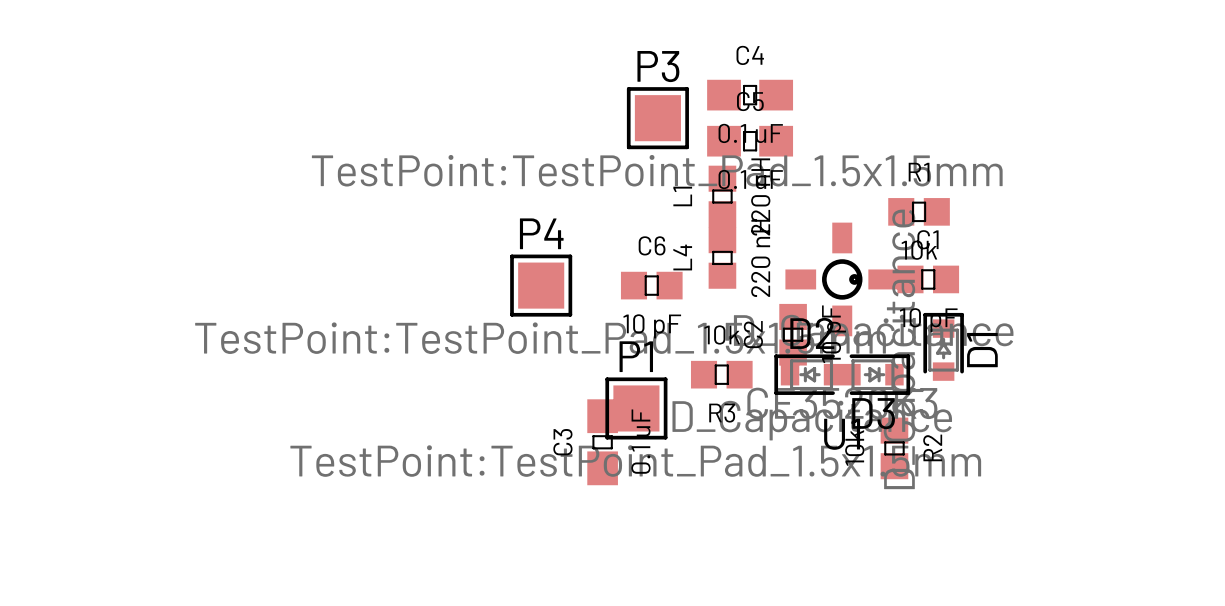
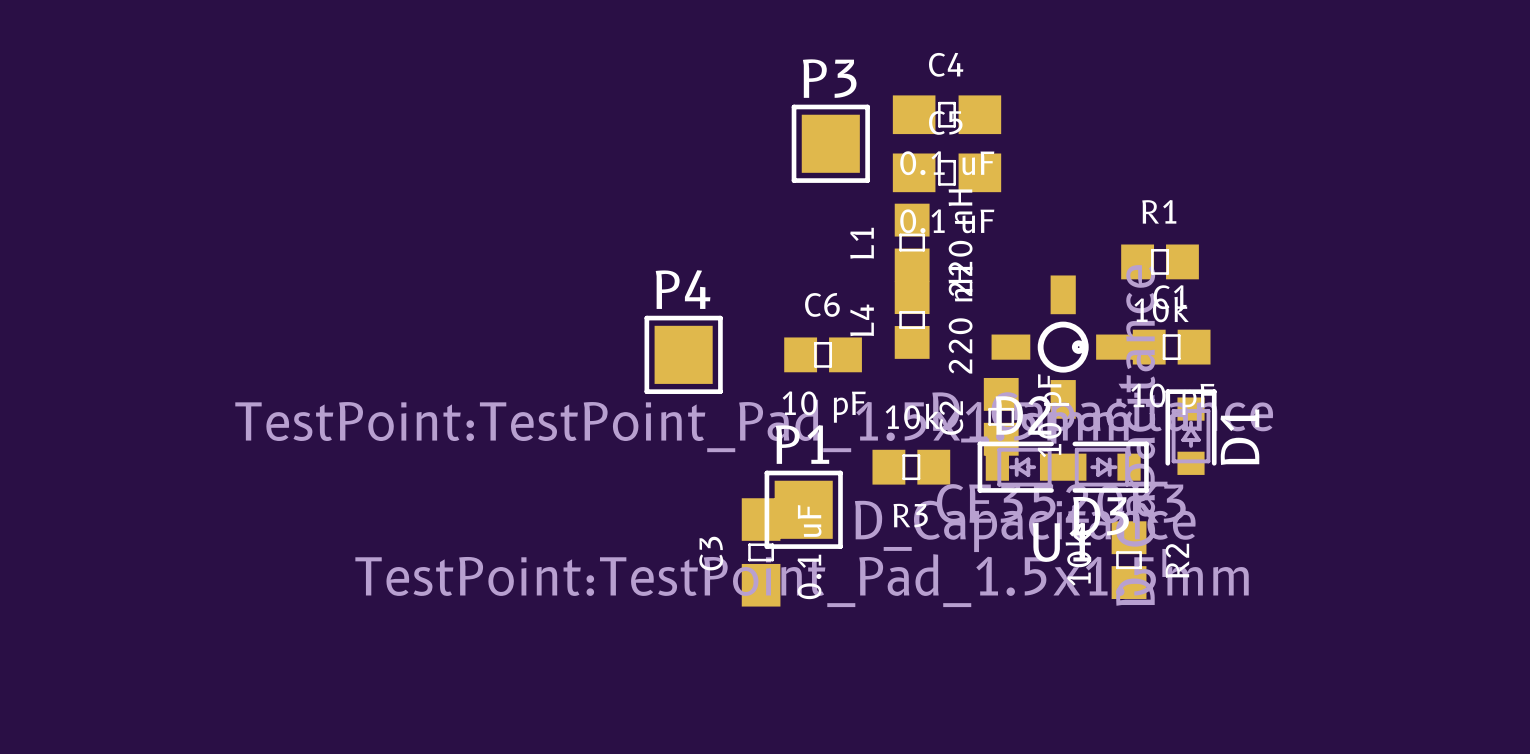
P3 value: TestPoint:TestPoint_Pad_1.5x1.5mm (657, 170) -> none

